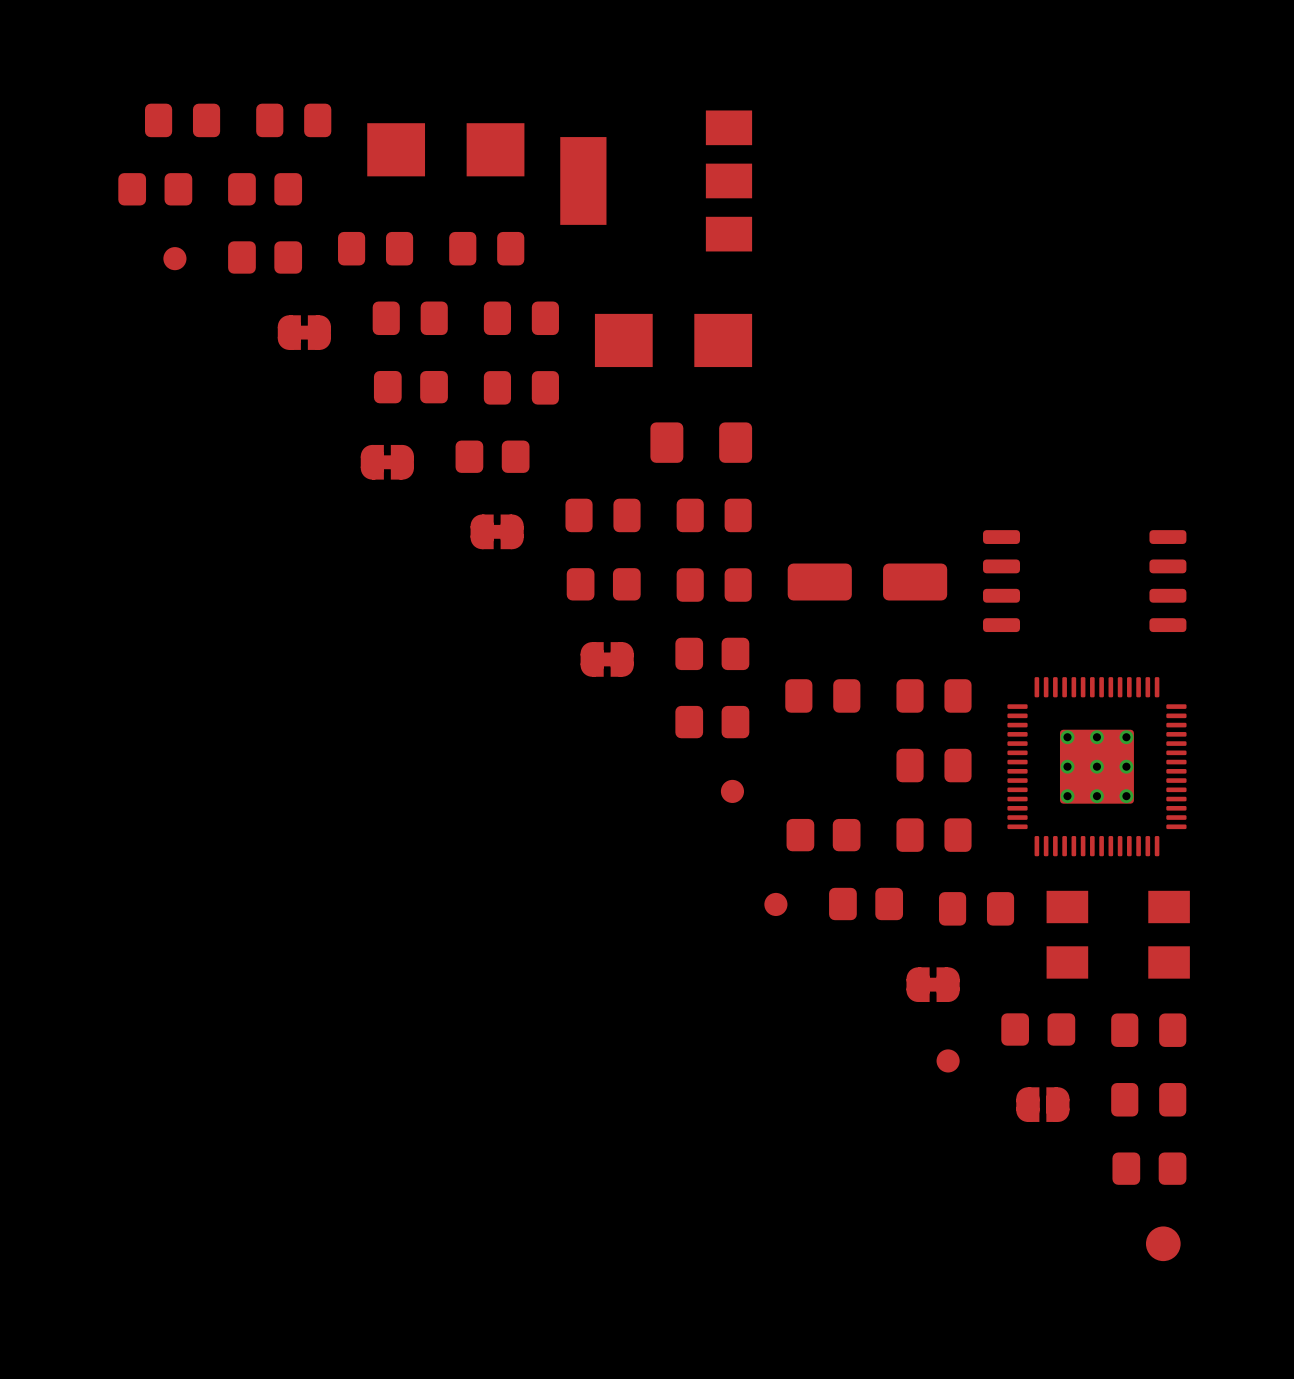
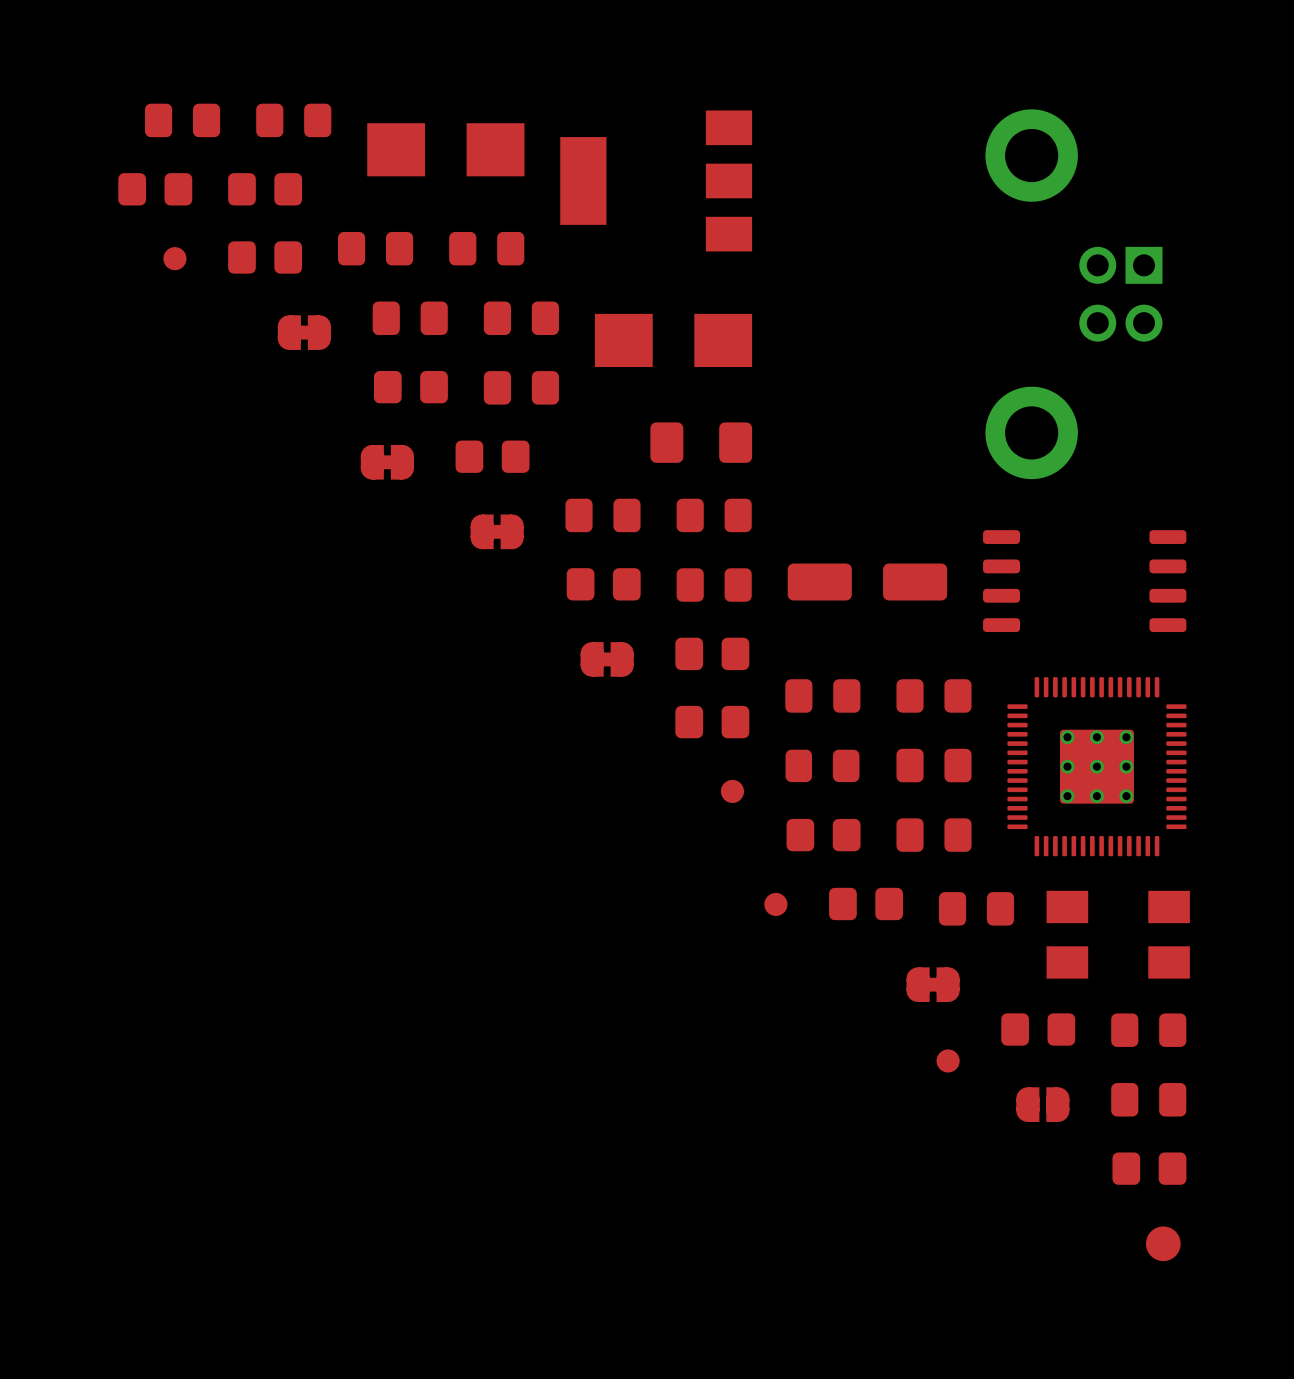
part: none -> (1073, 294)
part: none -> (822, 765)

